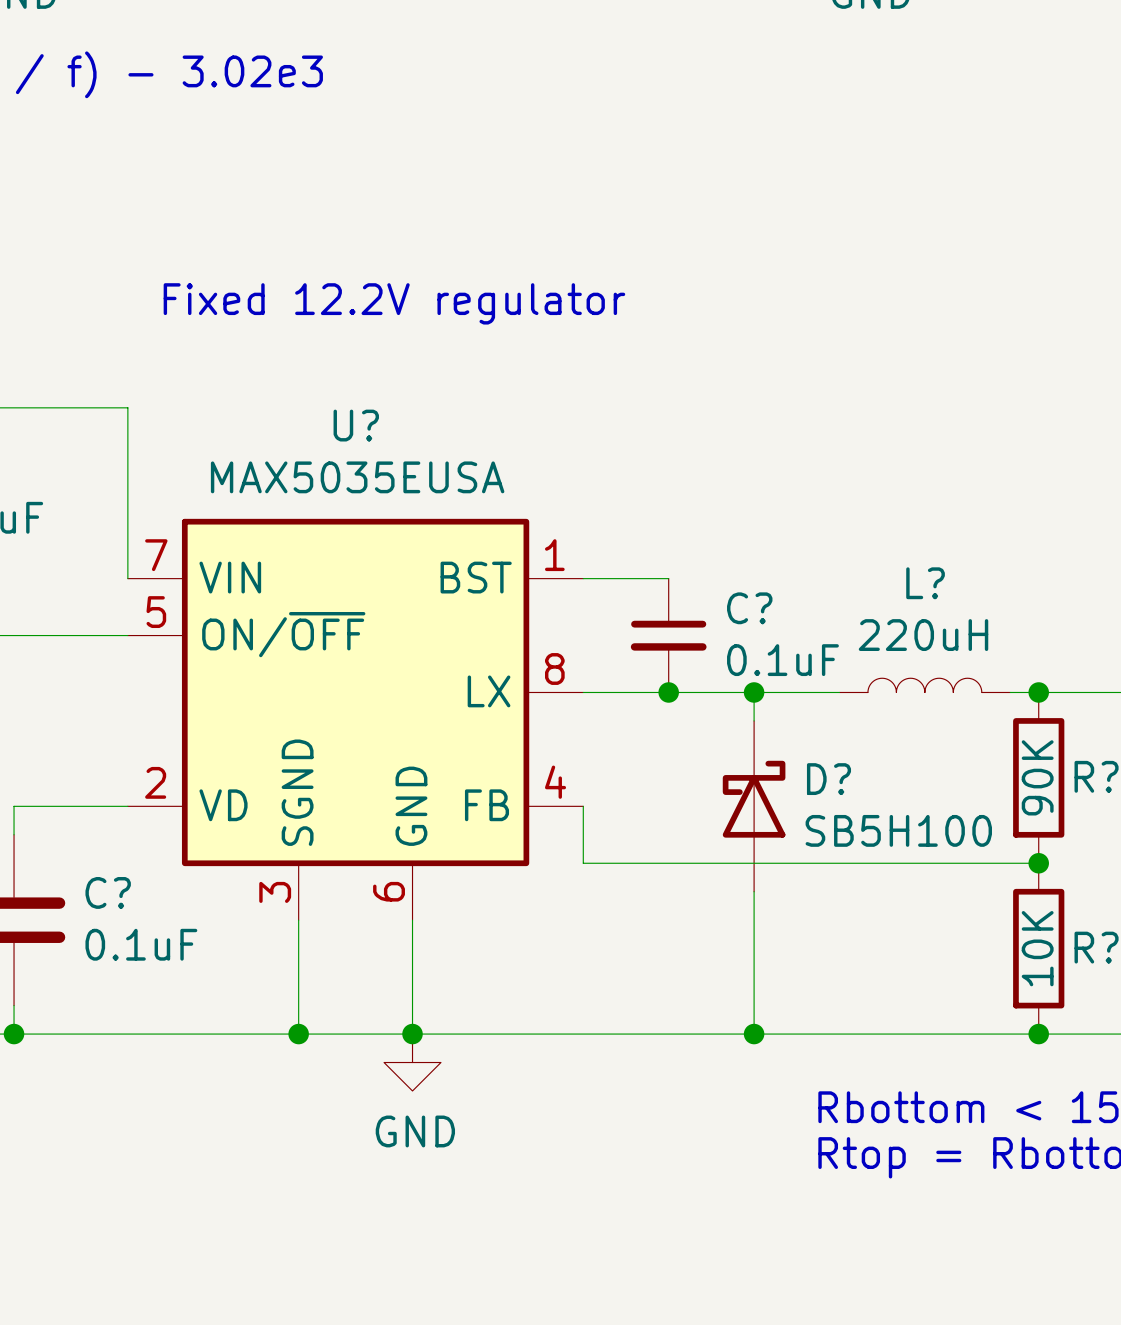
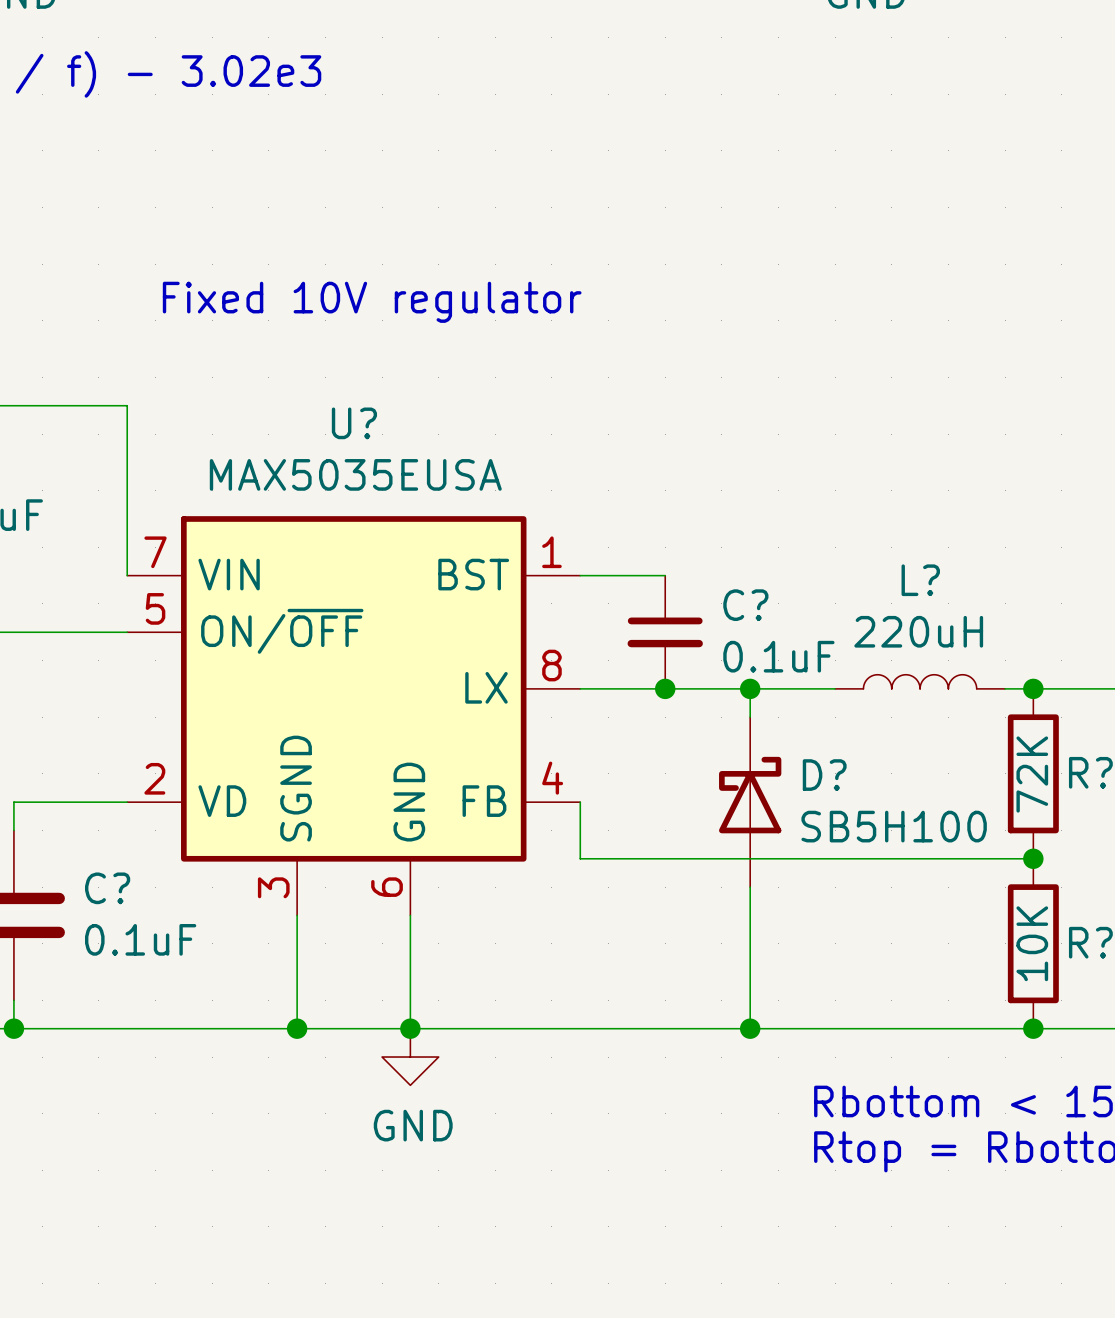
text: Fixed 12.2V regulator (394, 303) -> Fixed 10V regulator (372, 302)
R? value: 90K (1037, 777) -> 72K (1032, 774)

